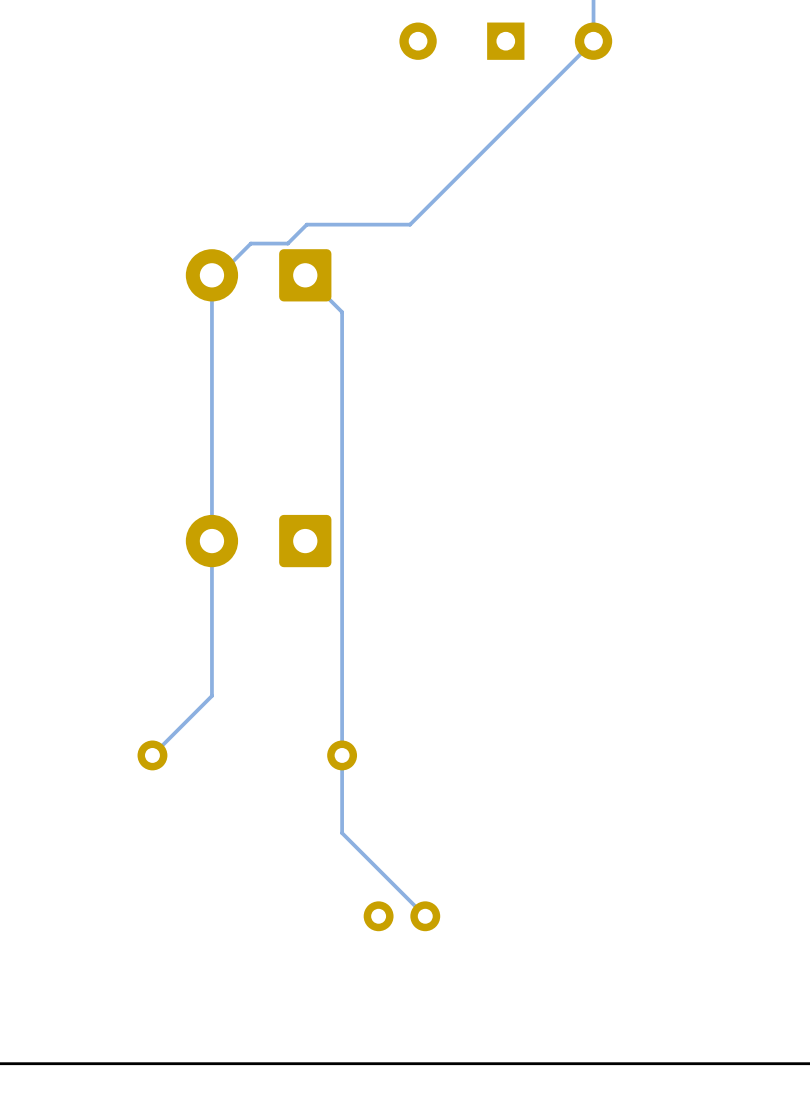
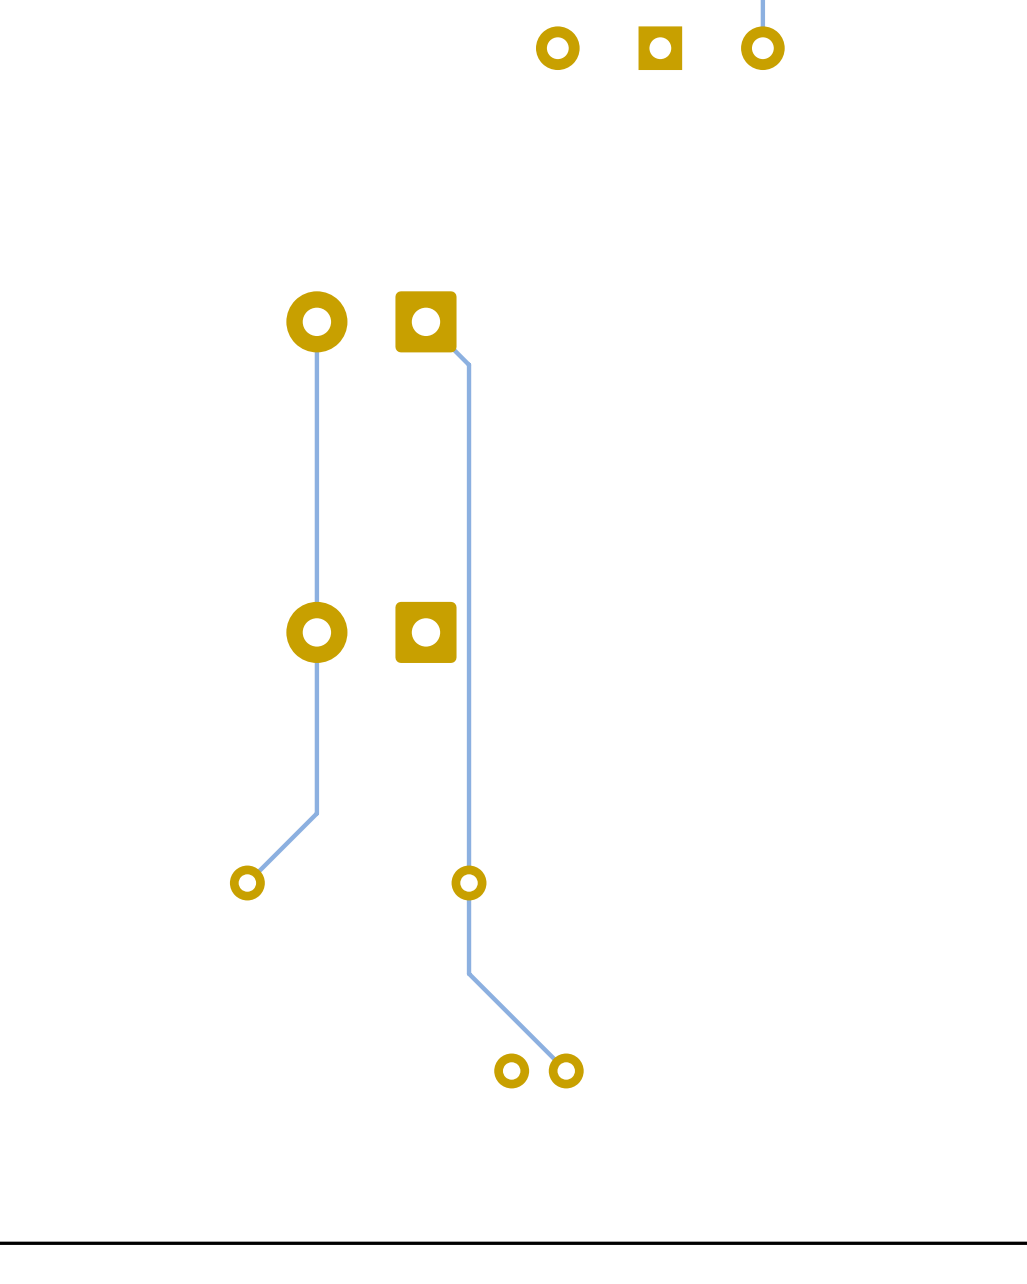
track: (593, 41) (410, 224) (306, 224) (287, 243) (250, 243) (219, 275) (211, 275) -> none

